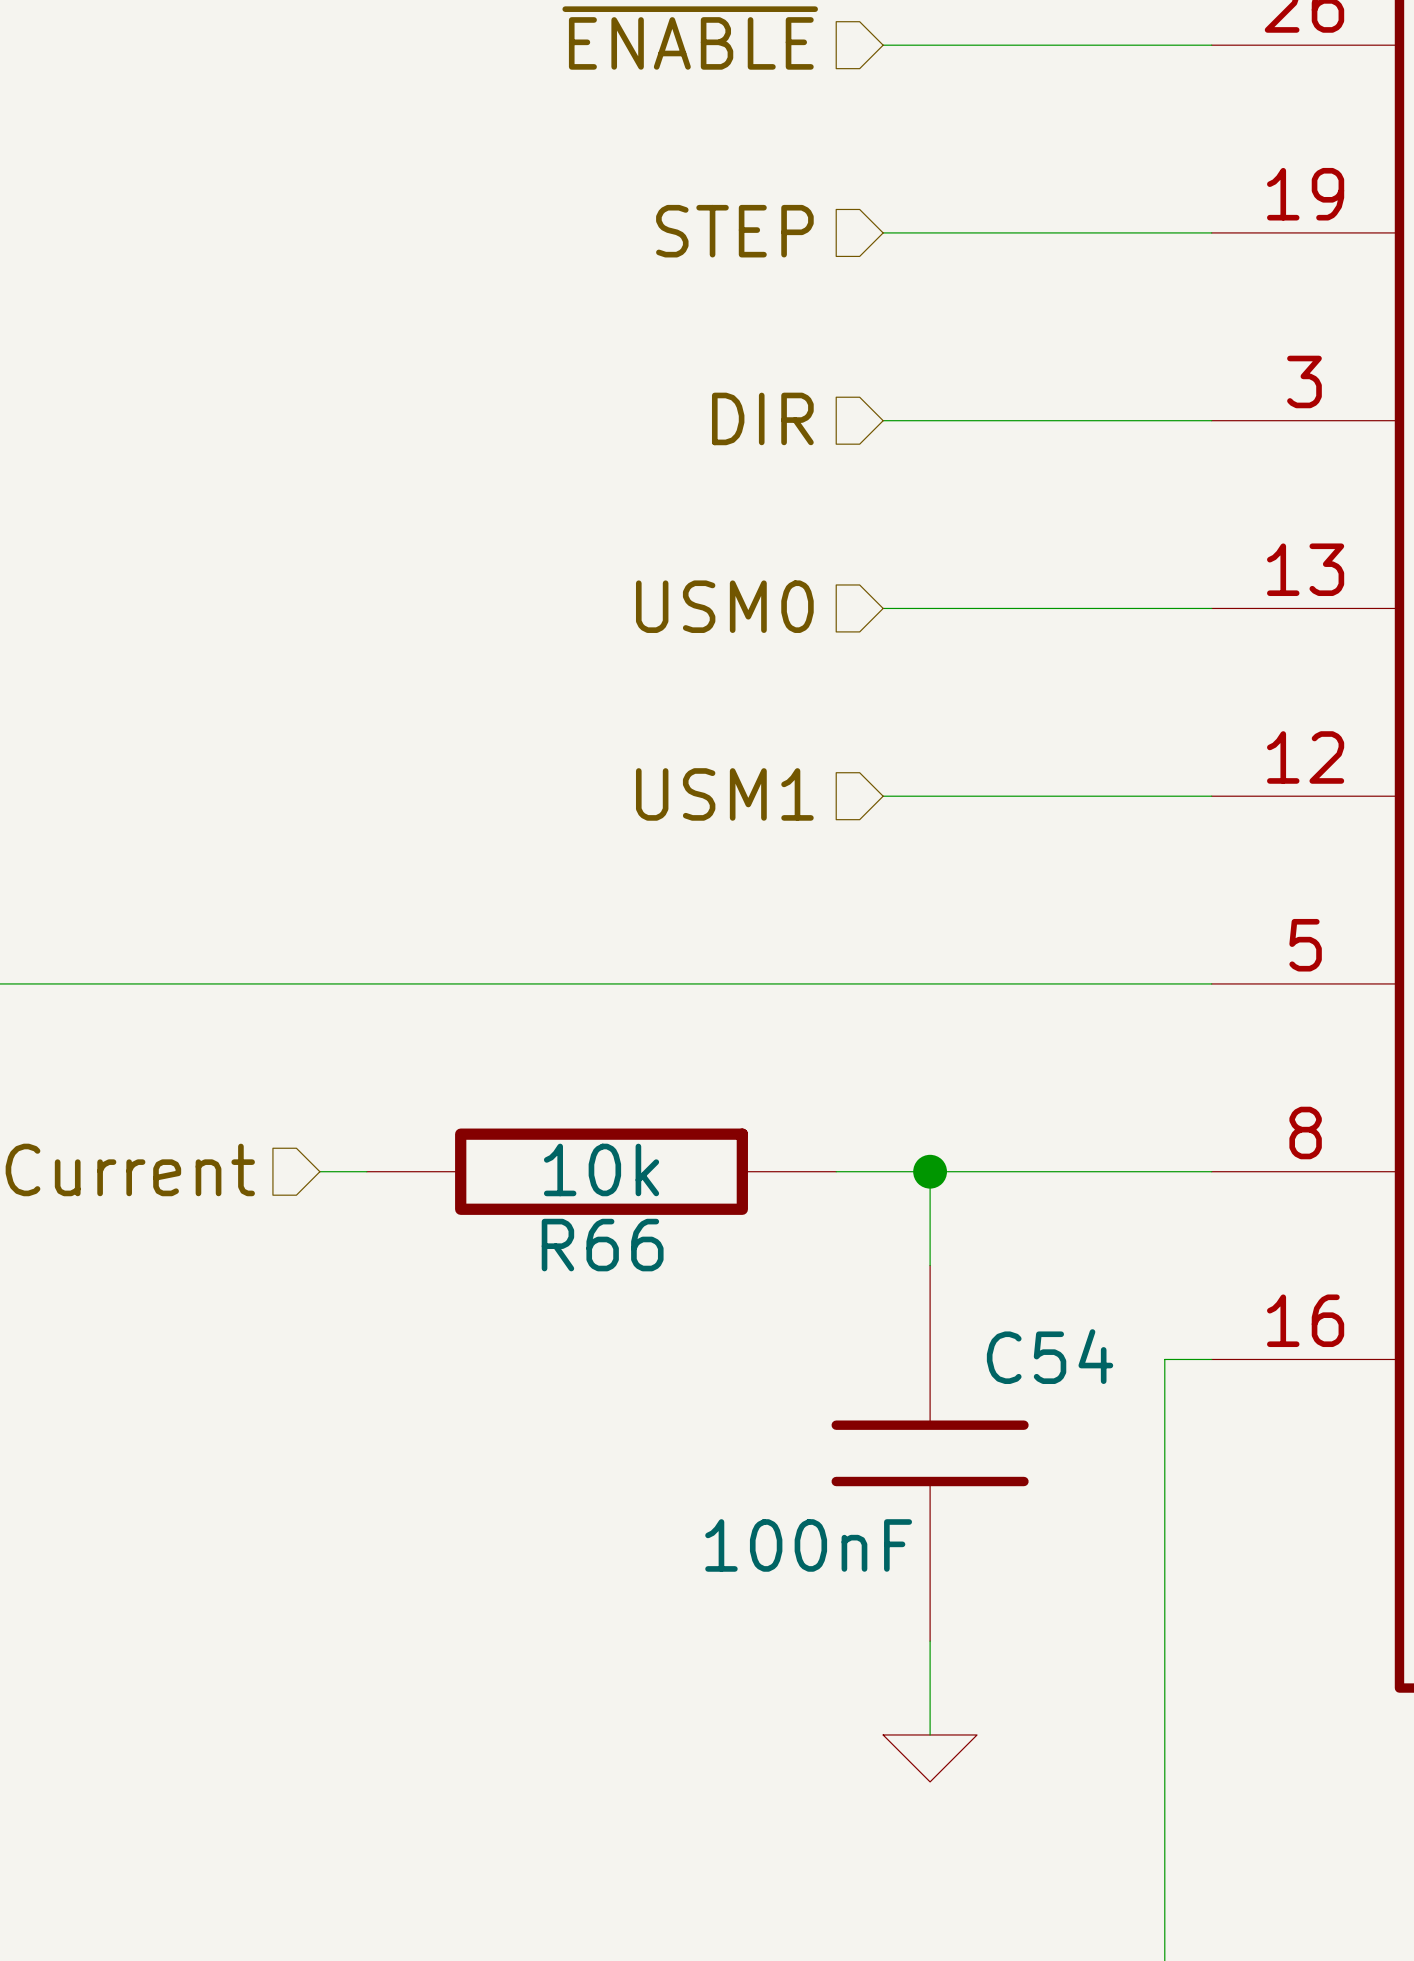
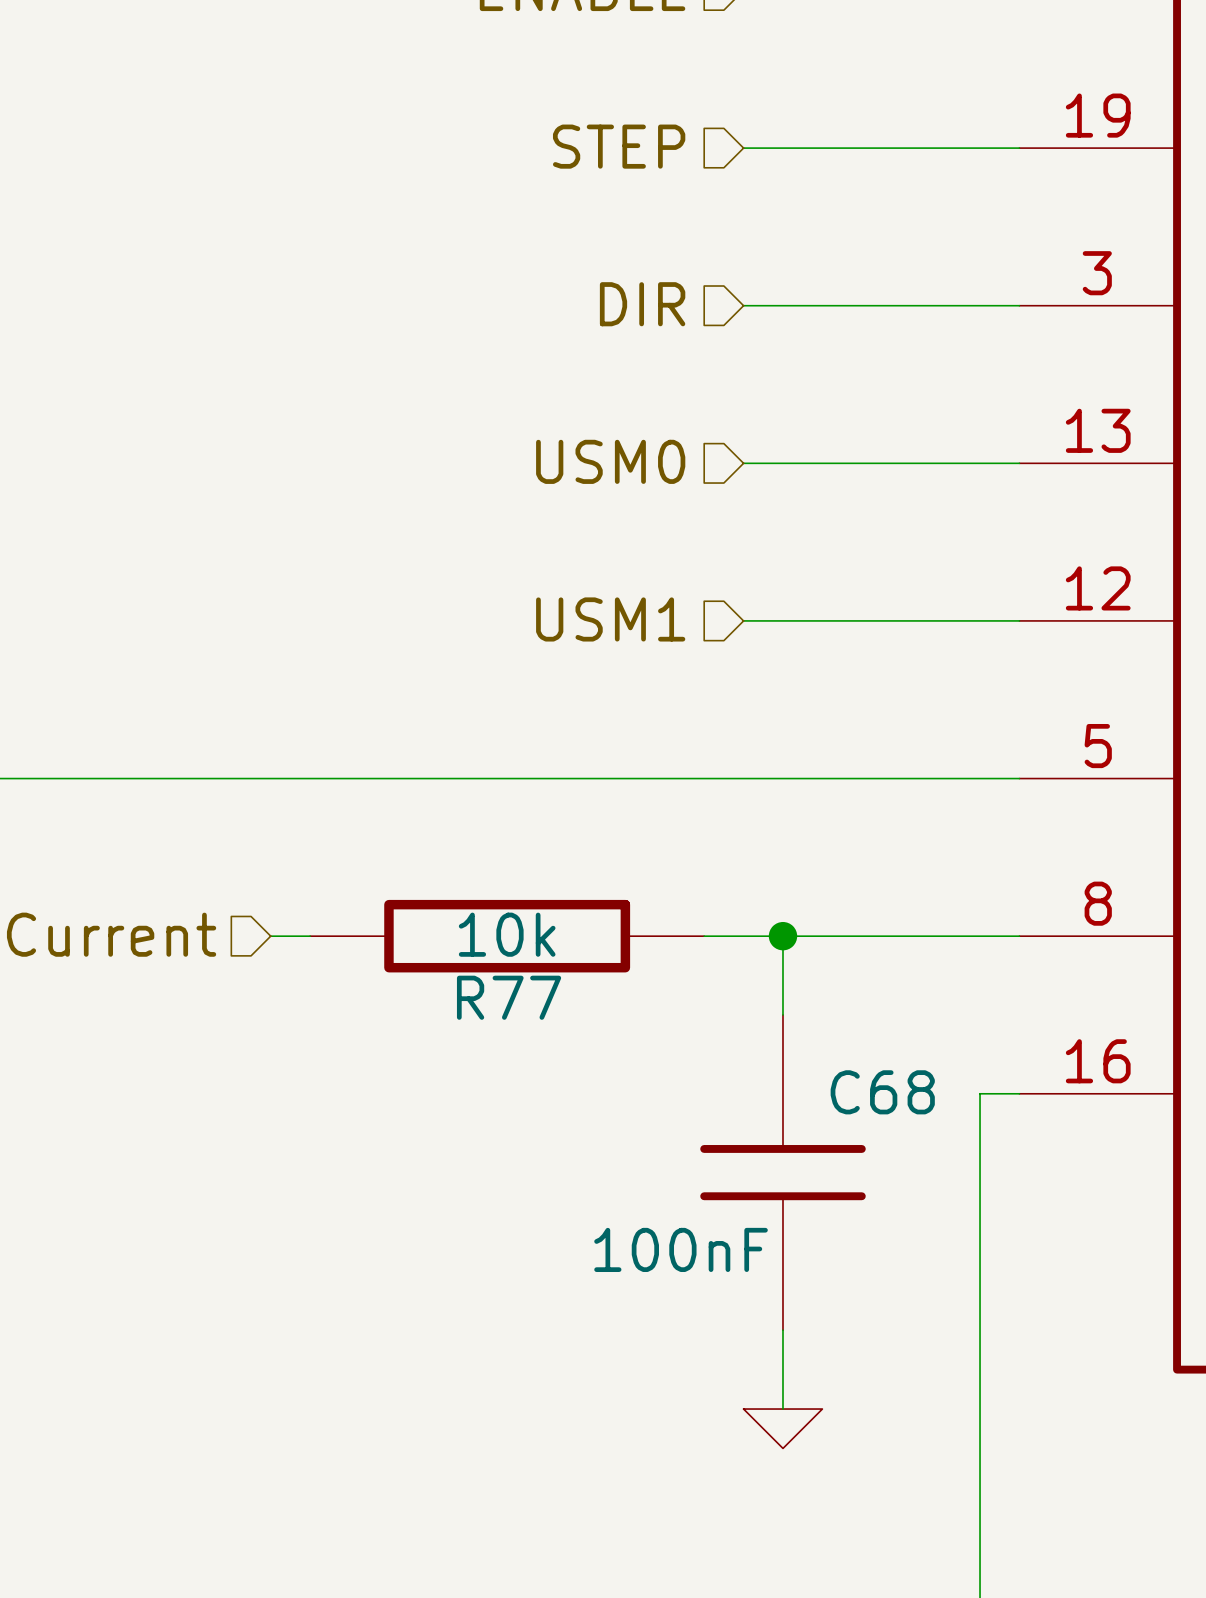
R66 name: R66 (602, 1245) -> R77 (509, 997)
C54 name: C54 (1050, 1356) -> C68 (882, 1092)

